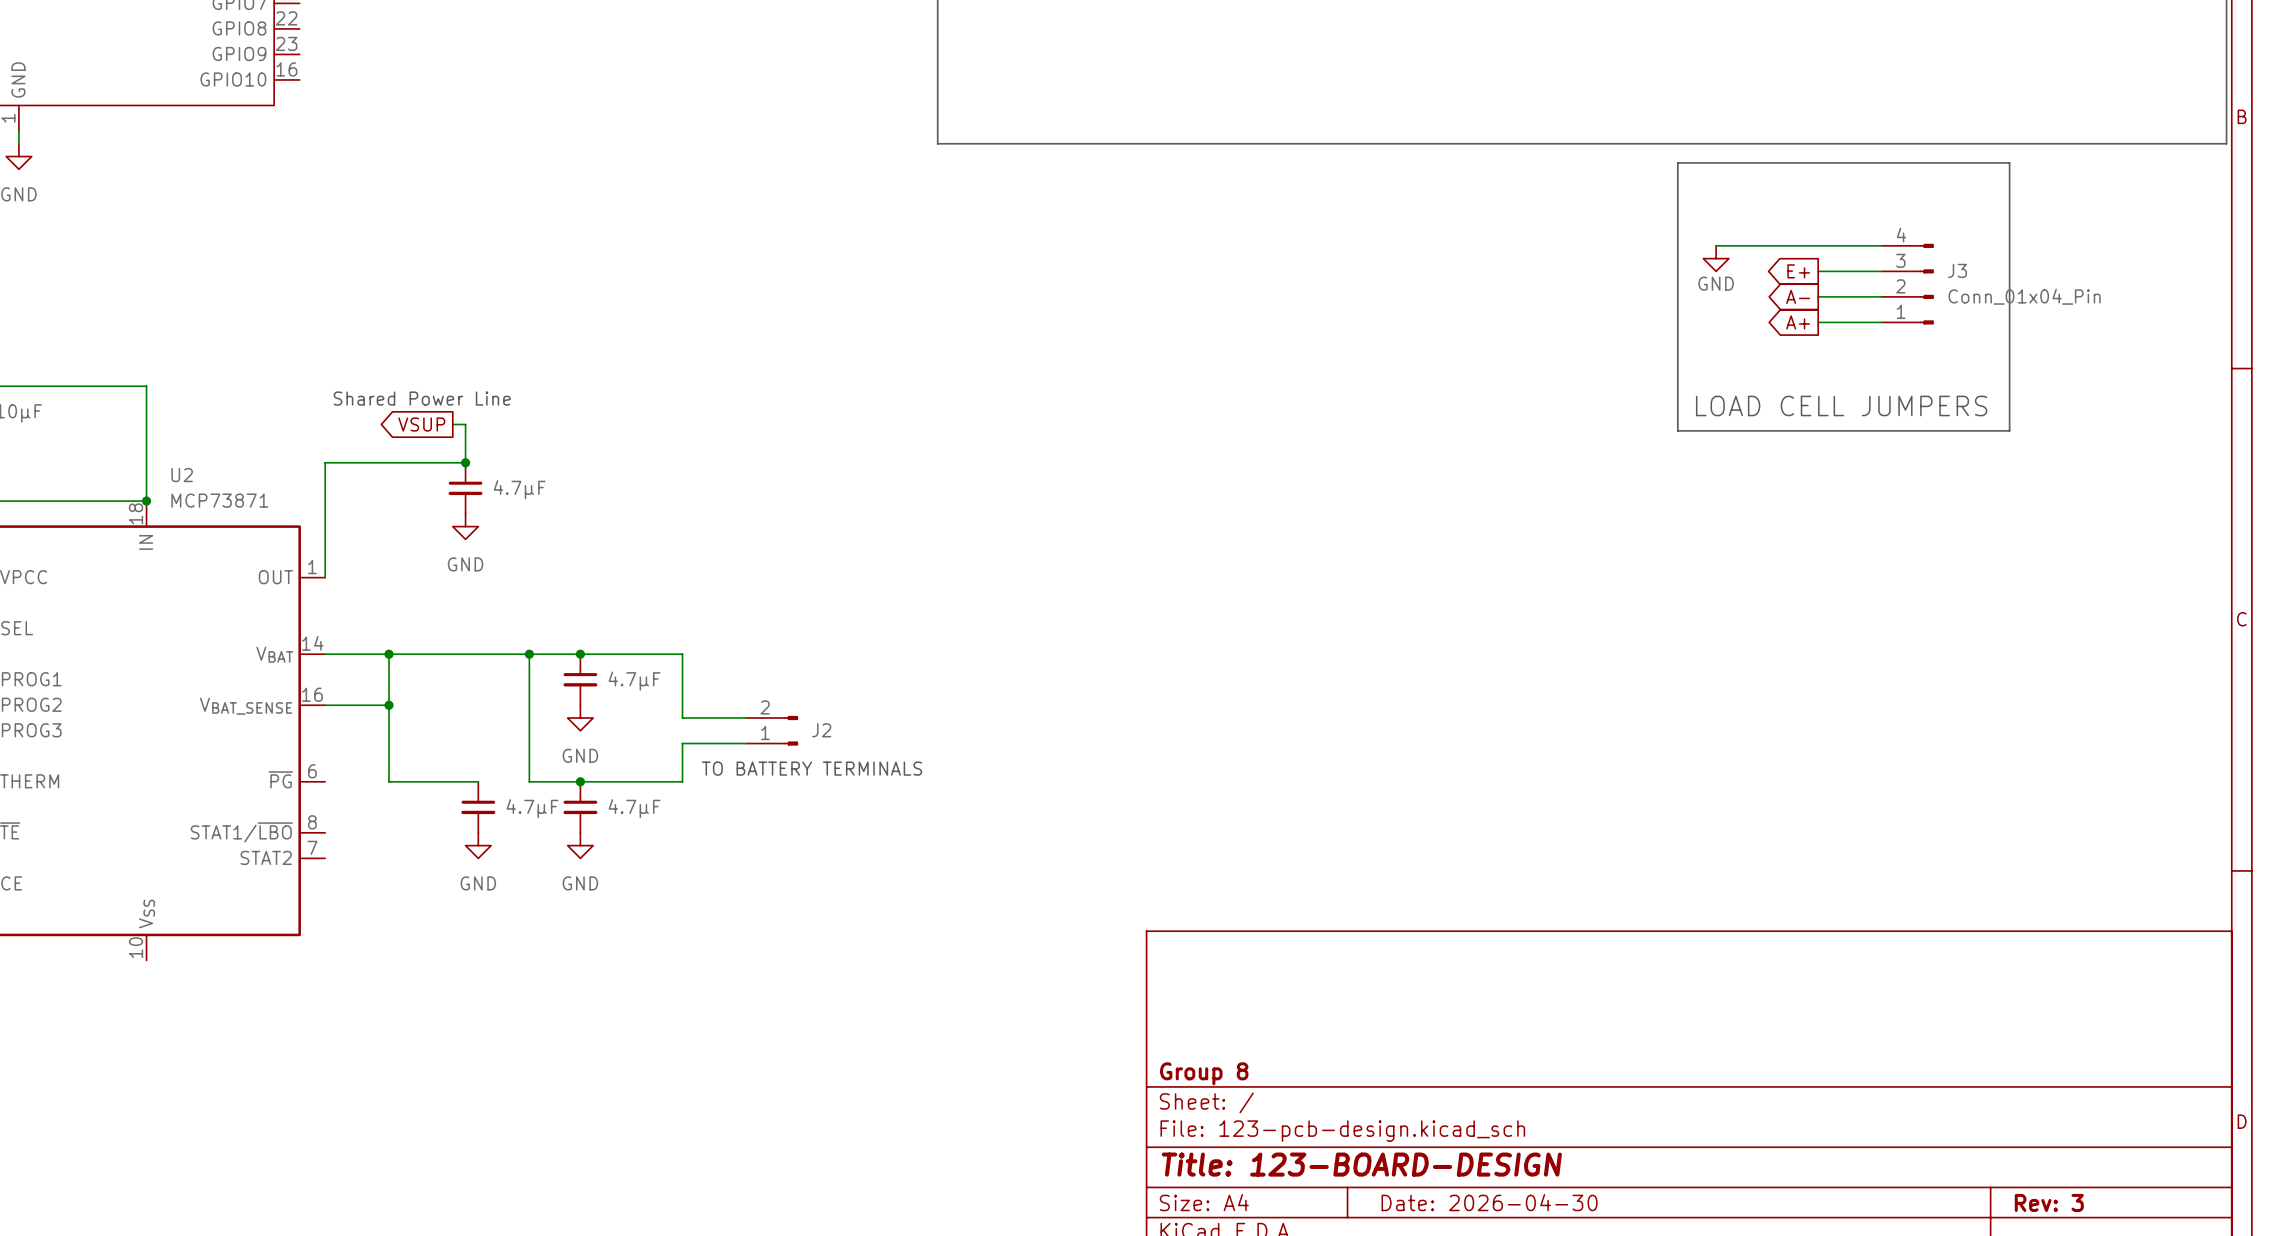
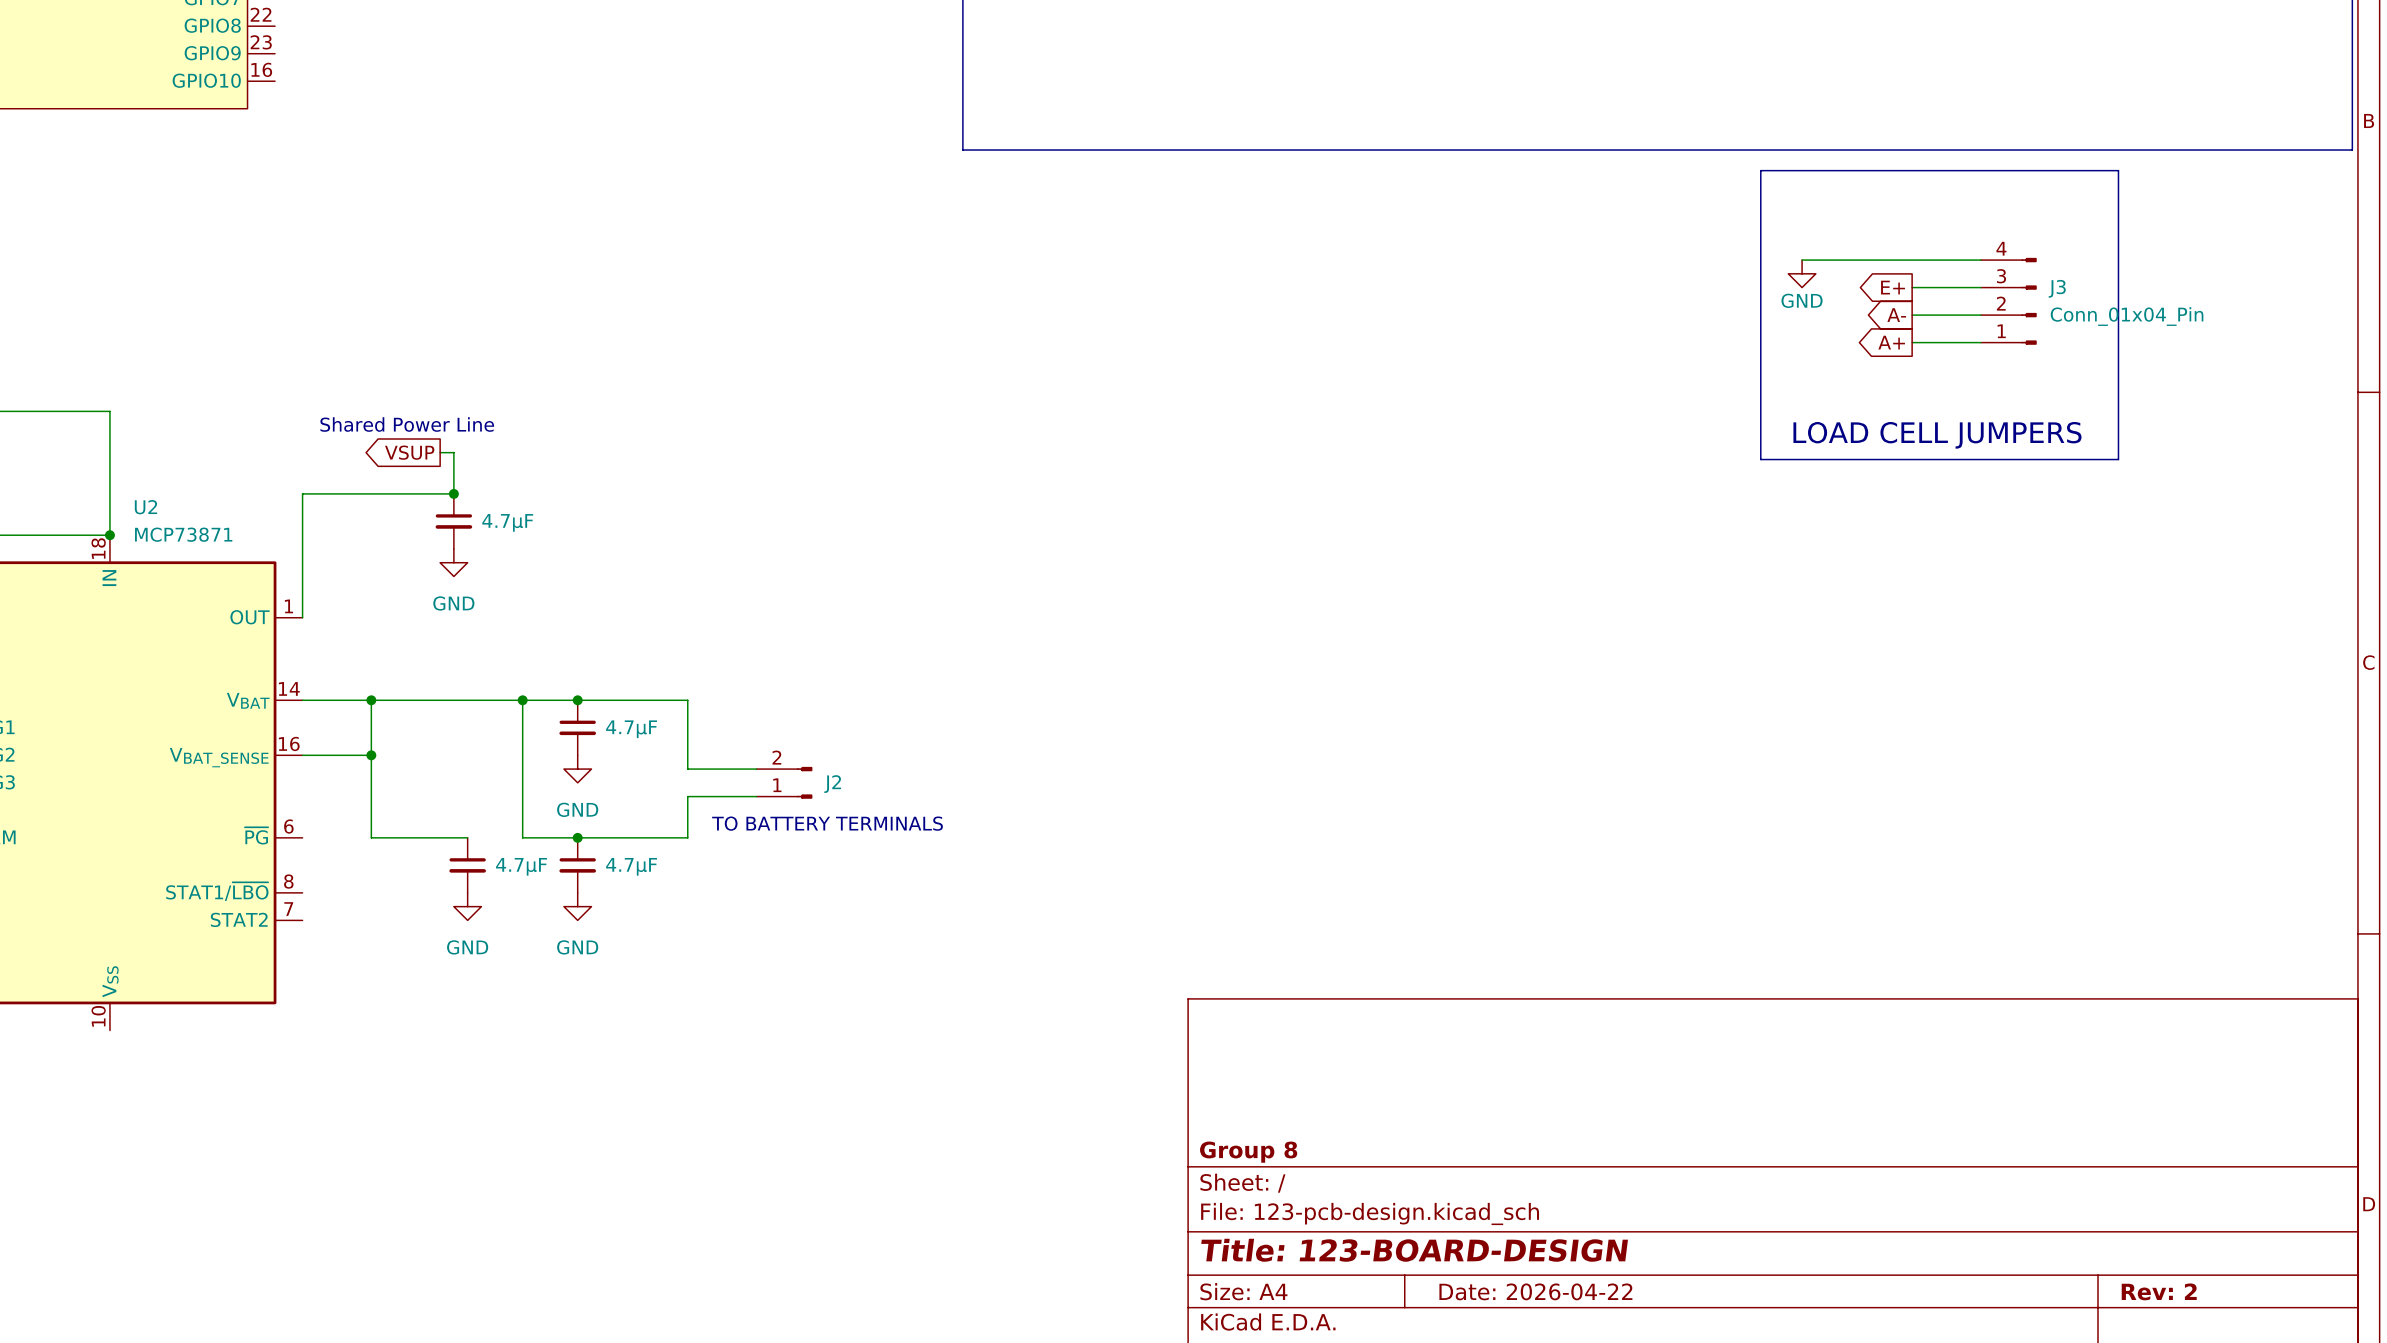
title block: Date: 2026-04-30 (1489, 1202) -> Date: 2026-04-22 (1535, 1291)
title block: Rev: 3 (2049, 1202) -> Rev: 2 (2159, 1291)

